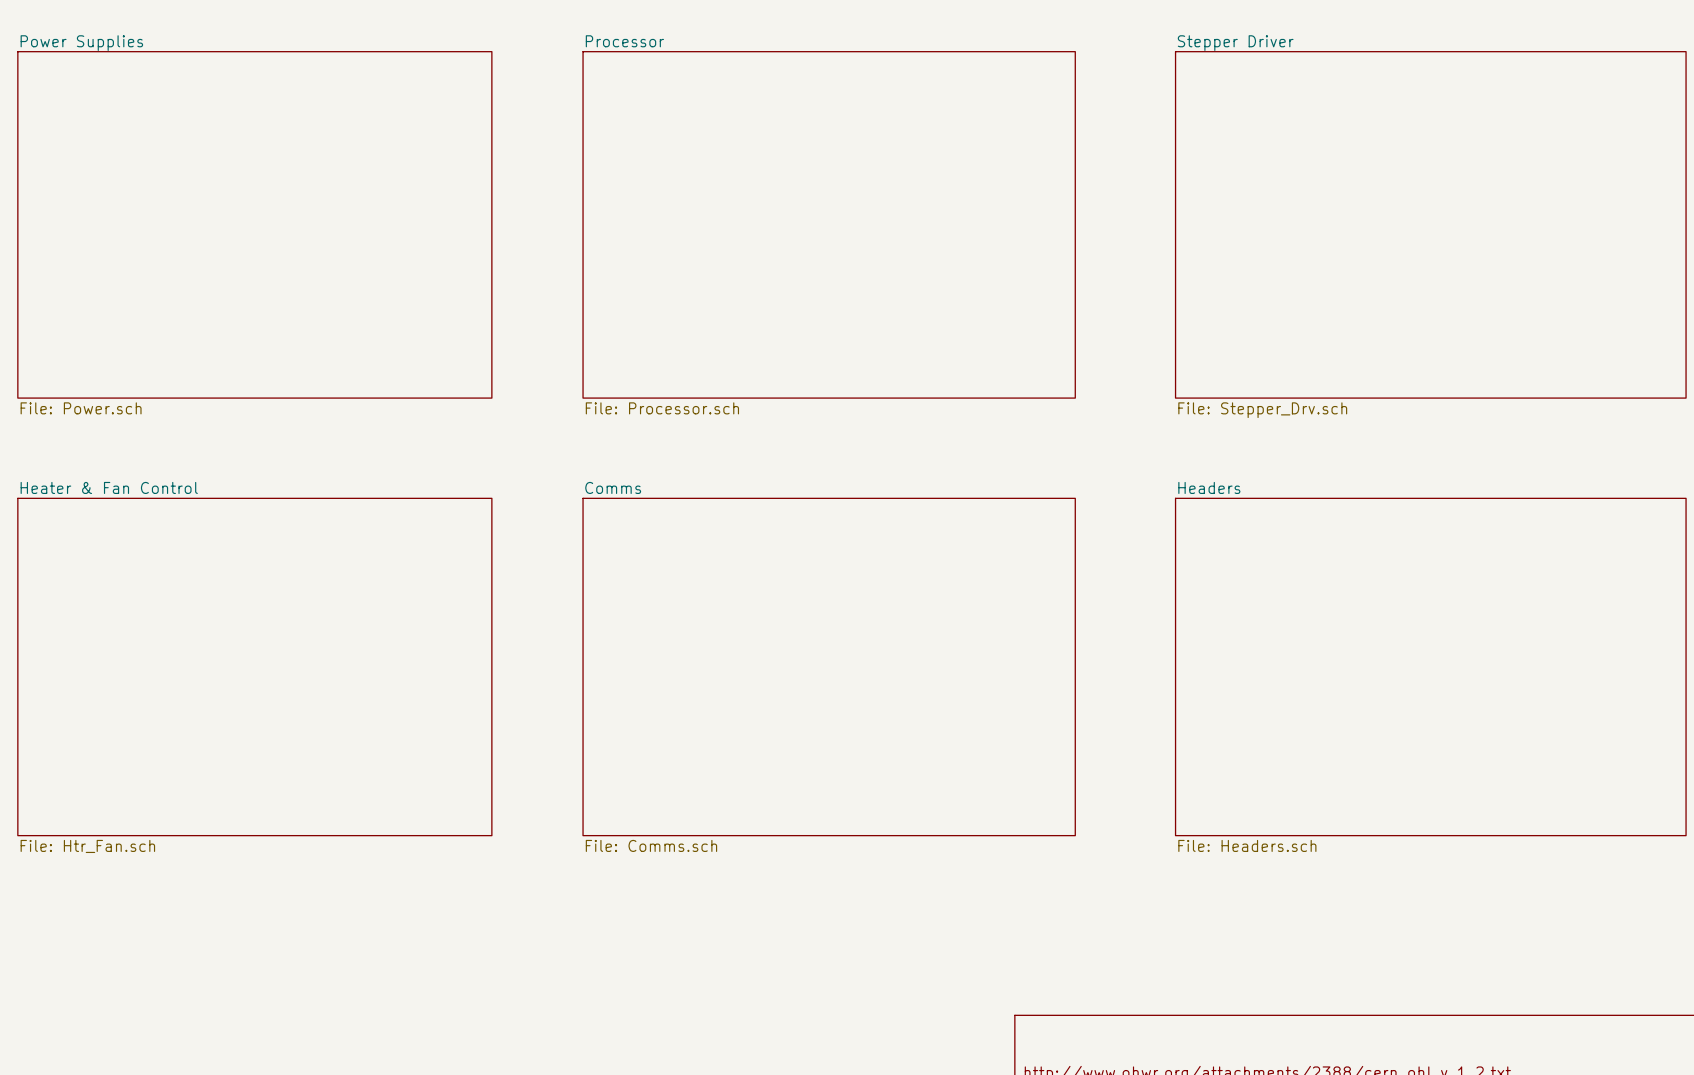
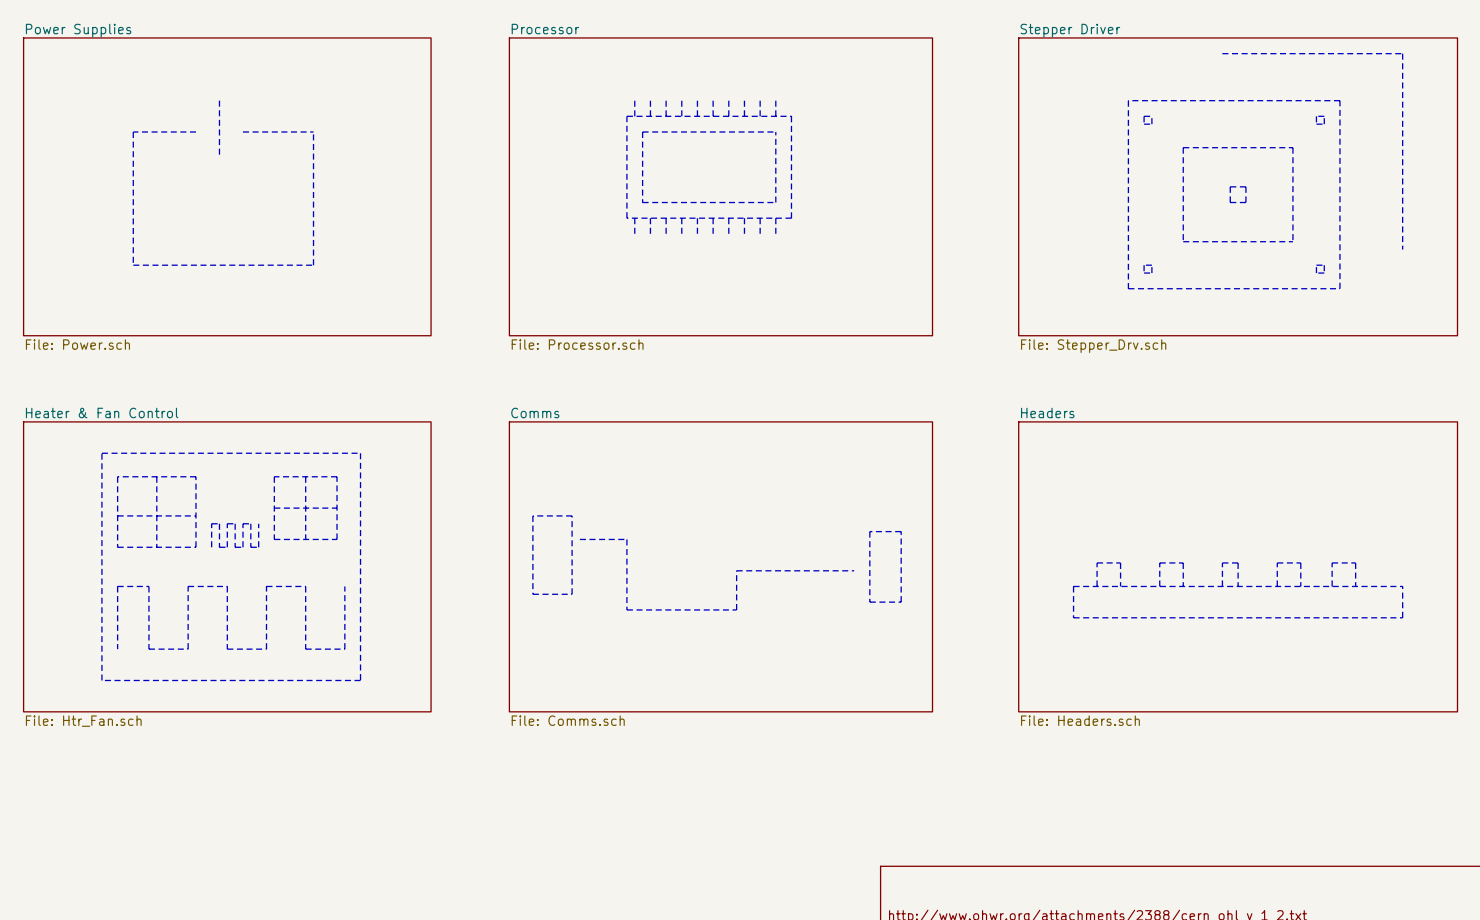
line: none -> (1222, 53) (1402, 53) (1402, 249)
line: none -> (219, 100) (219, 155)
line: none -> (634, 100) (634, 116)
line: none -> (650, 100) (650, 116)
line: none -> (666, 100) (666, 116)
line: none -> (681, 100) (681, 116)
line: none -> (697, 100) (697, 116)
line: none -> (713, 100) (713, 116)
line: none -> (728, 100) (728, 116)
line: none -> (744, 100) (744, 116)
line: none -> (760, 100) (760, 116)
line: none -> (775, 100) (775, 116)
line: none -> (1128, 100) (1128, 288) (1339, 288) (1339, 100) (1128, 100)
line: none -> (626, 116) (791, 116) (791, 218) (626, 218) (626, 116)
line: none -> (1144, 116) (1151, 116) (1151, 124) (1144, 124) (1144, 116)
line: none -> (1316, 116) (1324, 116) (1324, 124) (1316, 124) (1316, 116)
line: none -> (195, 132) (133, 132) (133, 265) (313, 265) (313, 132) (242, 132)
line: none -> (642, 132) (775, 132) (775, 202) (642, 202) (642, 132)
line: none -> (1183, 147) (1183, 241) (1292, 241) (1292, 147) (1183, 147)
line: none -> (1230, 186) (1245, 186) (1245, 202) (1230, 202) (1230, 186)
line: none -> (634, 218) (634, 233)
line: none -> (650, 218) (650, 233)
line: none -> (666, 218) (666, 233)
line: none -> (681, 218) (681, 233)
line: none -> (697, 218) (697, 233)
line: none -> (713, 218) (713, 233)
line: none -> (728, 218) (728, 233)
line: none -> (744, 218) (744, 233)
line: none -> (760, 218) (760, 233)
line: none -> (775, 218) (775, 233)
line: none -> (1144, 265) (1151, 265) (1151, 273) (1144, 273) (1144, 265)
line: none -> (1316, 265) (1324, 265) (1324, 273) (1316, 273) (1316, 265)
line: none -> (101, 453) (360, 453) (360, 680) (101, 680) (101, 453)
line: none -> (117, 476) (117, 547) (195, 547) (195, 476) (117, 476)
line: none -> (156, 476) (156, 547)
line: none -> (274, 476) (337, 476) (337, 539) (274, 539) (274, 476)
line: none -> (305, 476) (305, 539)
line: none -> (274, 508) (337, 508)
line: none -> (117, 515) (195, 515)
line: none -> (532, 515) (572, 515) (572, 594) (532, 594) (532, 515)
line: none -> (258, 523) (258, 547) (250, 547) (250, 523) (242, 523) (242, 547) (235, 547) (235, 523) (227, 523) (227, 547) (219, 547) (219, 523) (211, 523) (211, 547)
line: none -> (869, 531) (901, 531) (901, 602) (869, 602) (869, 531)
line: none -> (579, 539) (626, 539) (626, 609) (736, 609) (736, 570) (854, 570)
line: none -> (344, 586) (344, 649) (305, 649) (305, 586) (266, 586) (266, 649) (227, 649) (227, 586) (188, 586) (188, 649) (148, 649) (148, 586) (117, 586) (117, 649)
line: none -> (1073, 586) (1402, 586) (1402, 617) (1073, 617) (1073, 586)
line: none -> (1097, 586) (1097, 562) (1120, 562) (1120, 586)
line: none -> (1159, 586) (1159, 562) (1183, 562) (1183, 586)
line: none -> (1222, 586) (1222, 562) (1238, 562) (1238, 586)
line: none -> (1277, 586) (1277, 562) (1300, 562) (1300, 586)
line: none -> (1332, 586) (1332, 562) (1355, 562) (1355, 586)

